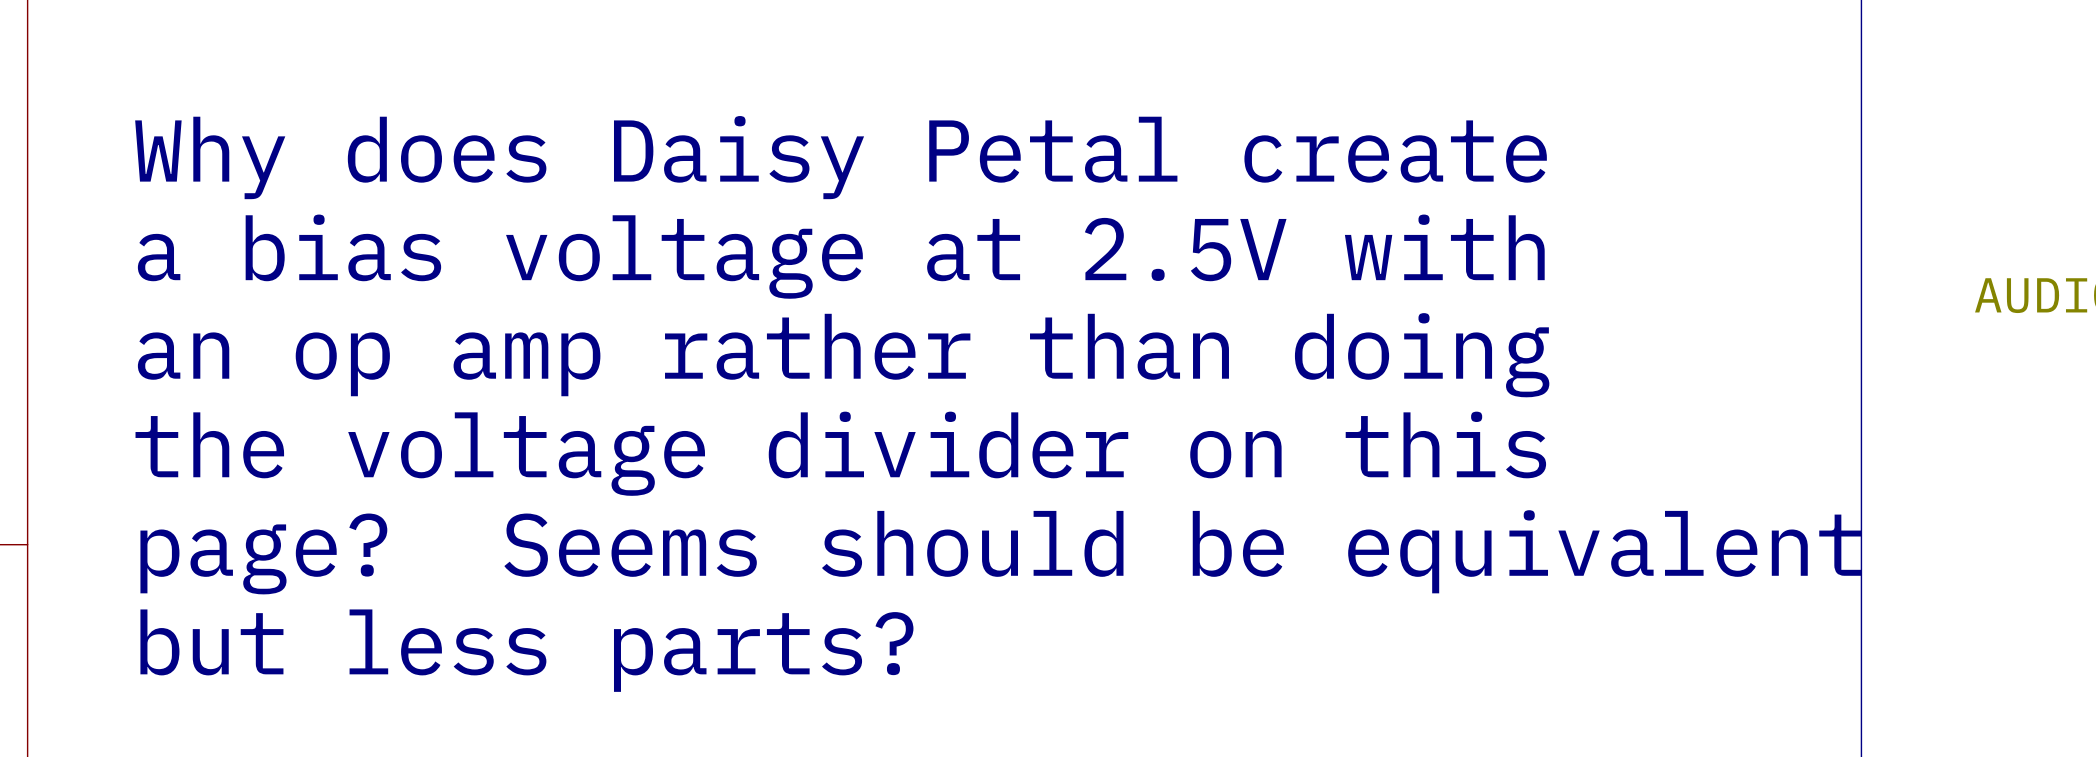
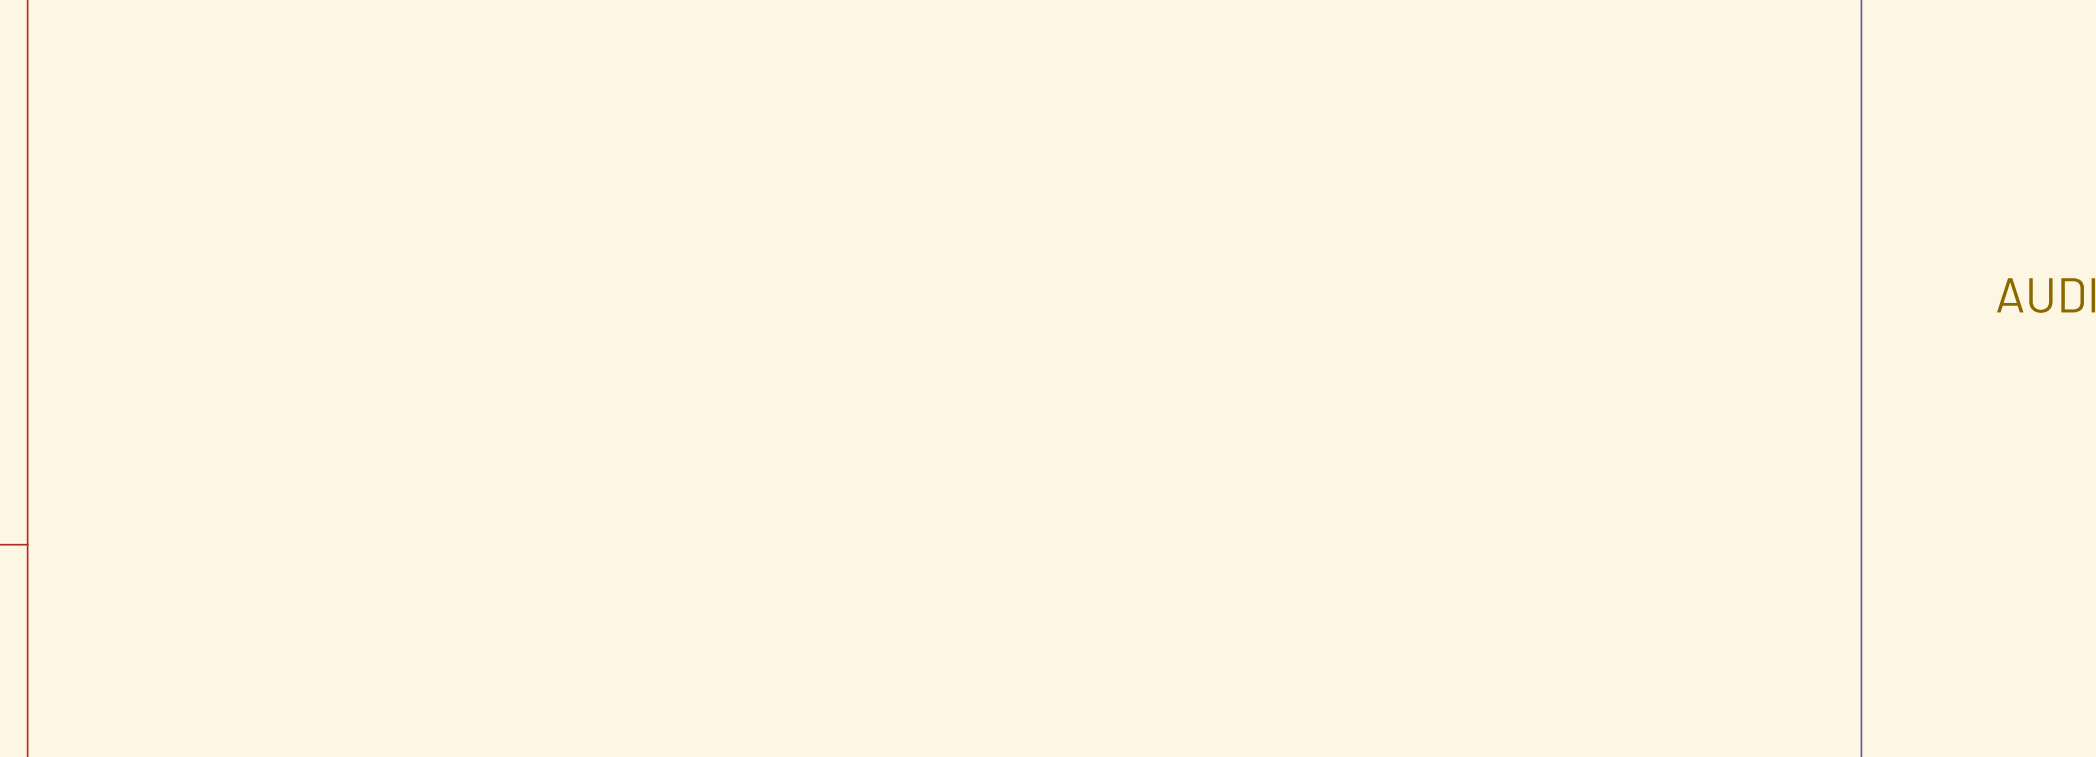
text: Why does Daisy Petal create (841, 157) -> none
text: a bias voltage at 2.5V with (841, 256) -> none
text: an op amp rather than doing (843, 355) -> none
text: the voltage divider on this (840, 453) -> none
text: page? Seems should be equivalent (1001, 552) -> none
text: but less parts? (526, 650) -> none

